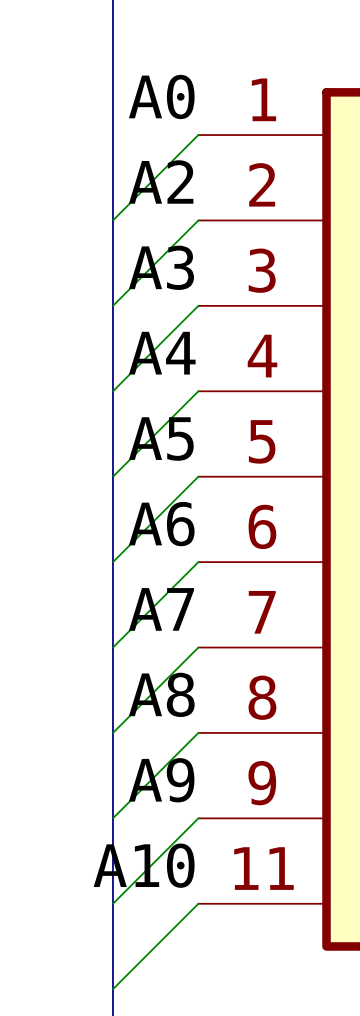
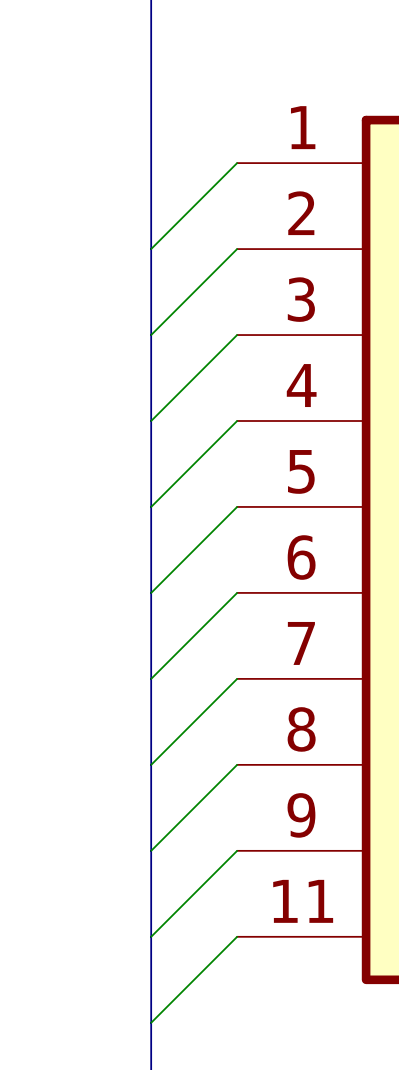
label: A0 (161, 96) -> none
label: A2 (161, 181) -> none
label: A3 (161, 267) -> none
label: A4 (162, 353) -> none
label: A5 (161, 439) -> none
label: A6 (161, 524) -> none
label: A7 (161, 609) -> none
label: A8 (161, 694) -> none
label: A9 (161, 780) -> none
label: A10 (144, 865) -> none

